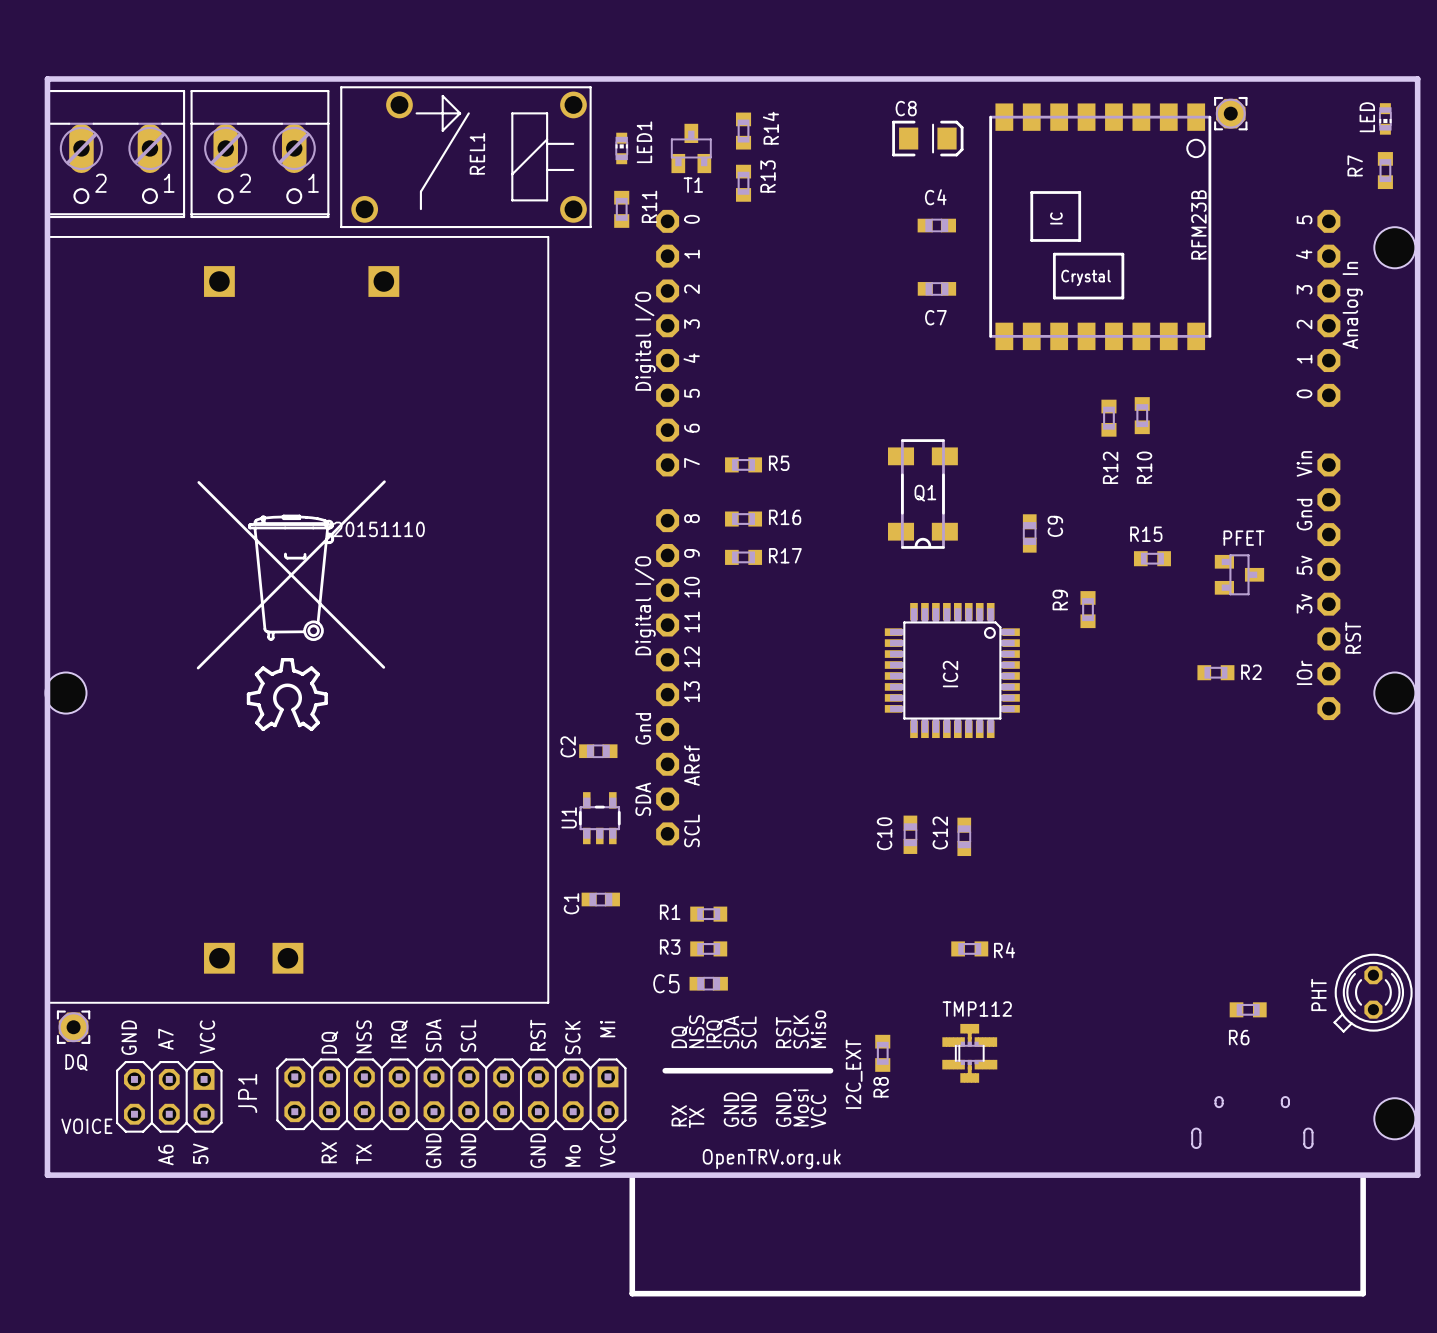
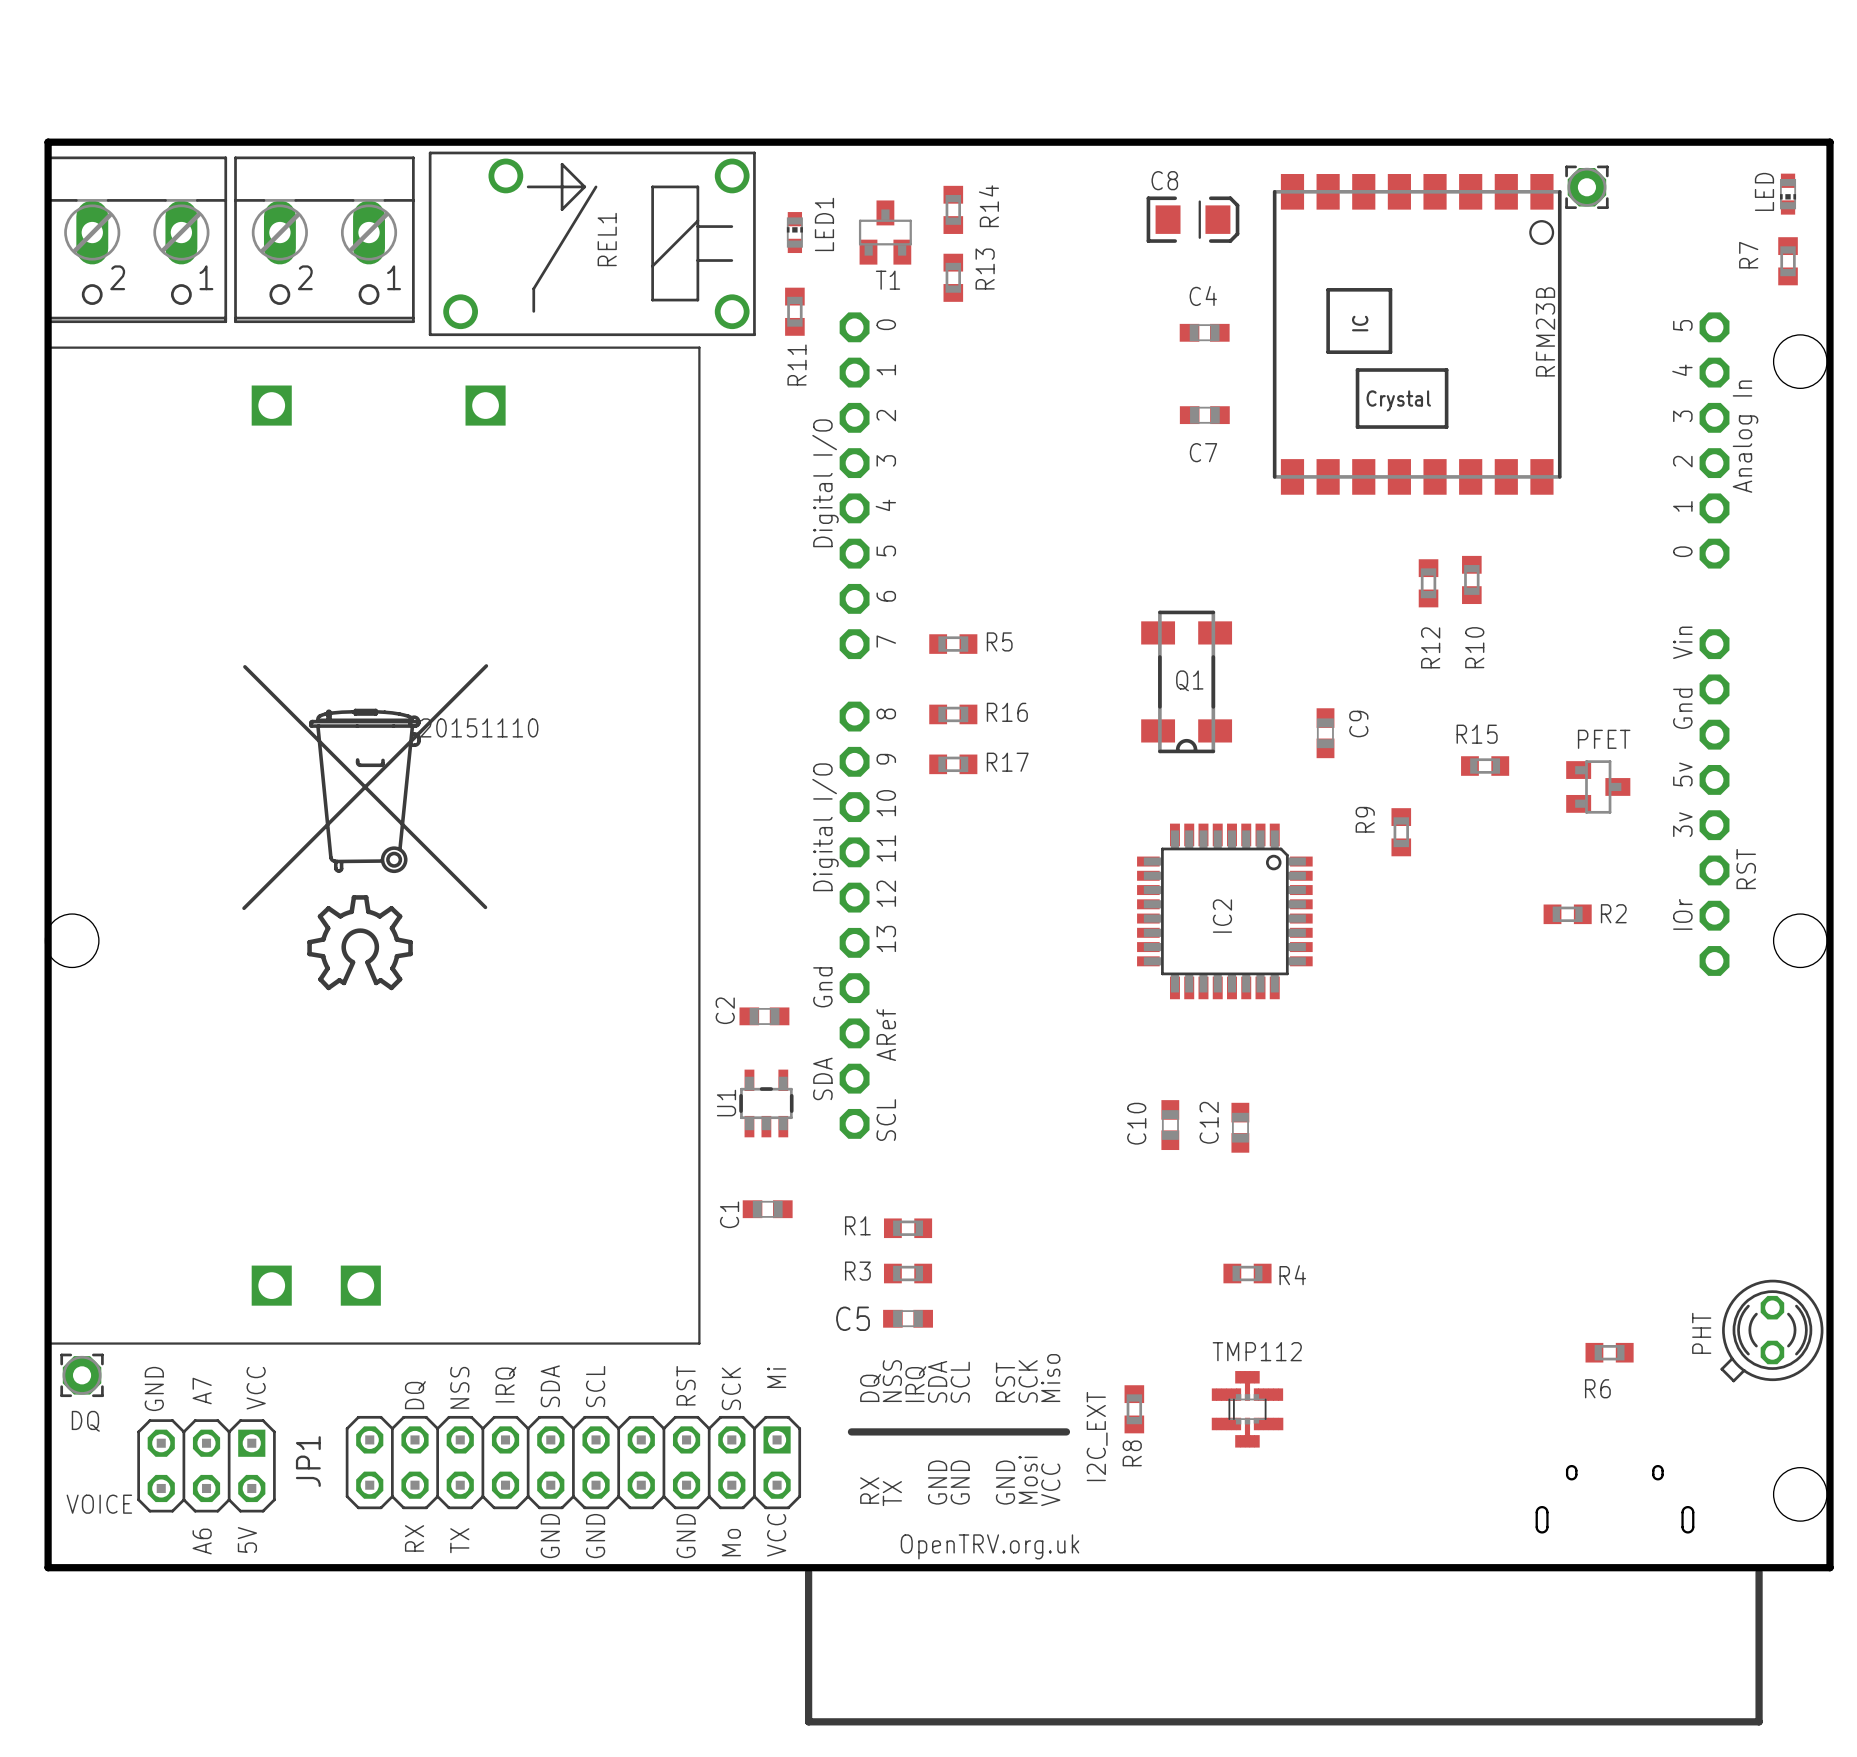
R11 name position: R11 (649, 206) -> R11 (797, 365)

